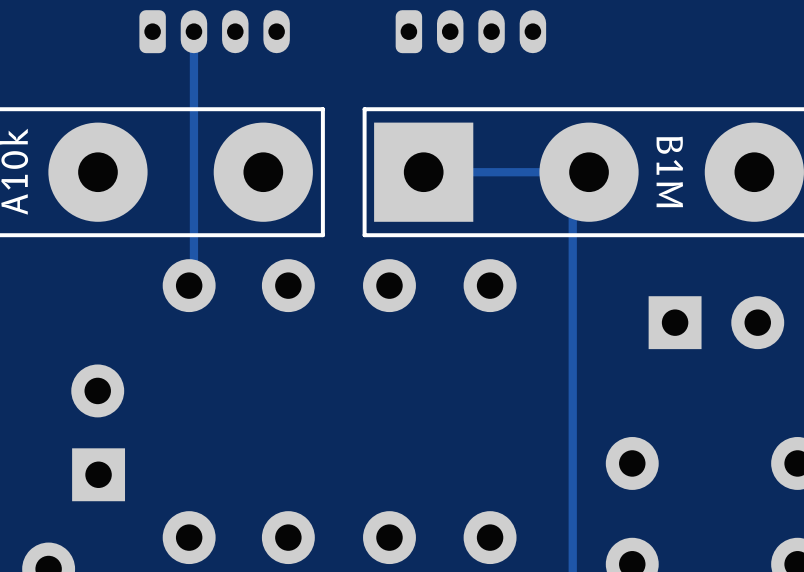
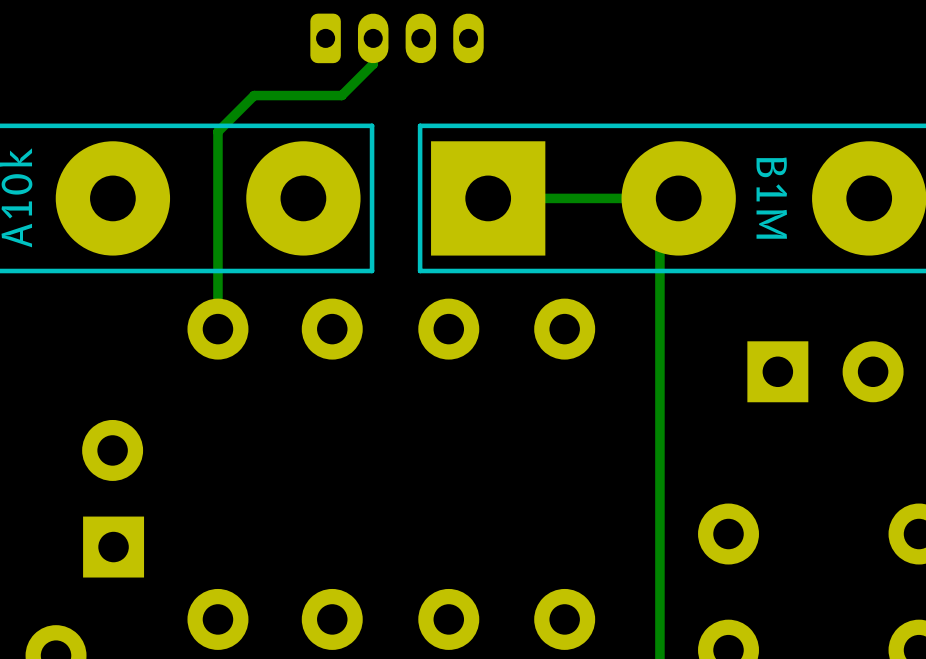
track: (193, 31) (193, 280) (189, 285) -> (373, 38) (373, 64) (341, 95) (254, 95) (217, 131) (217, 329)
part: (214, 31) -> none
part: (470, 31) -> none
part: none -> (397, 38)

